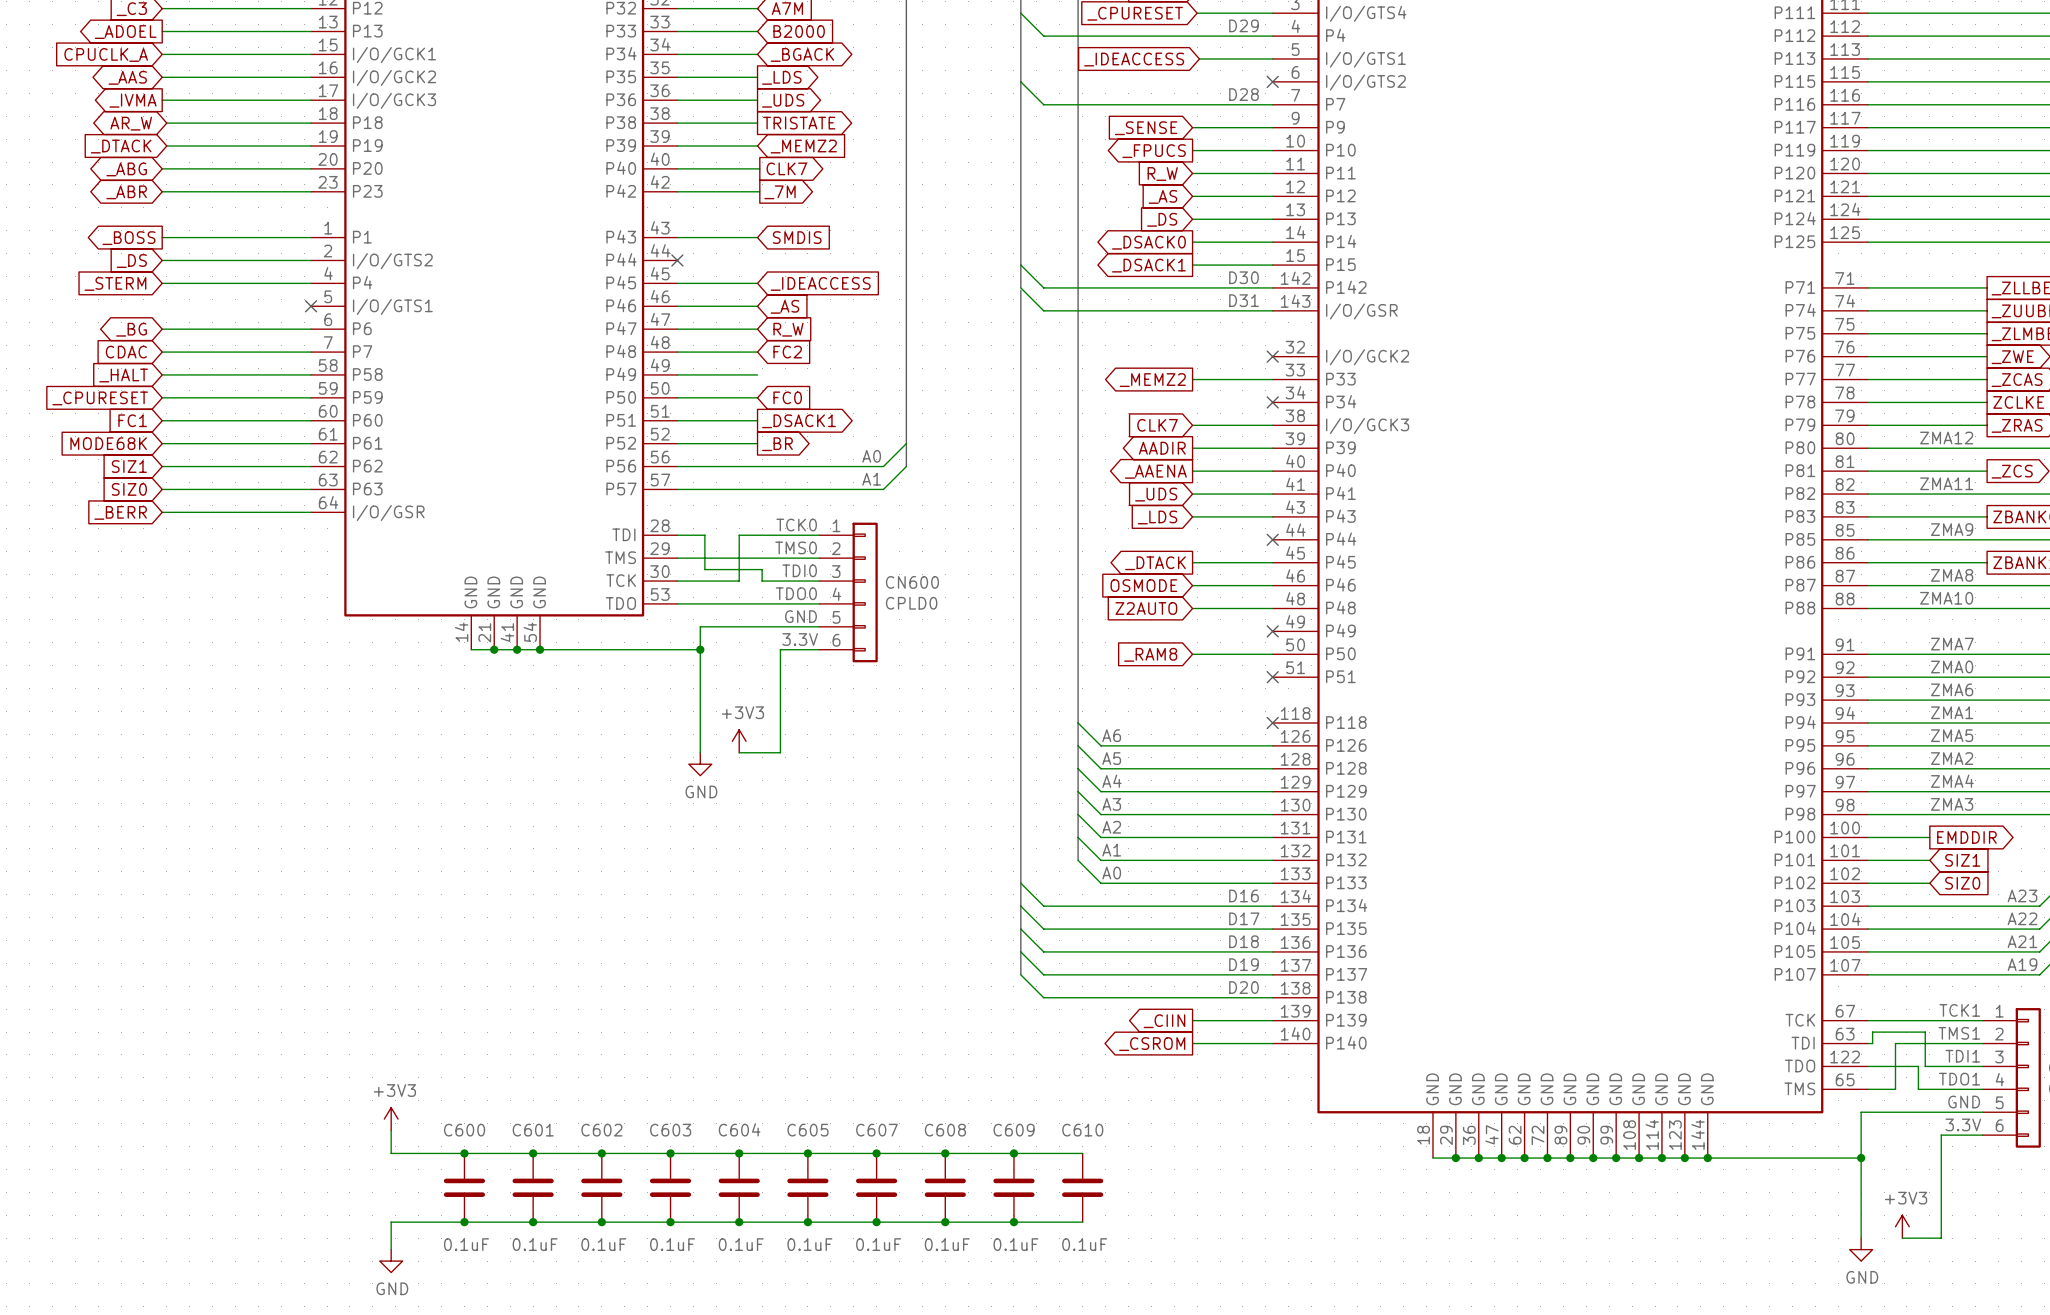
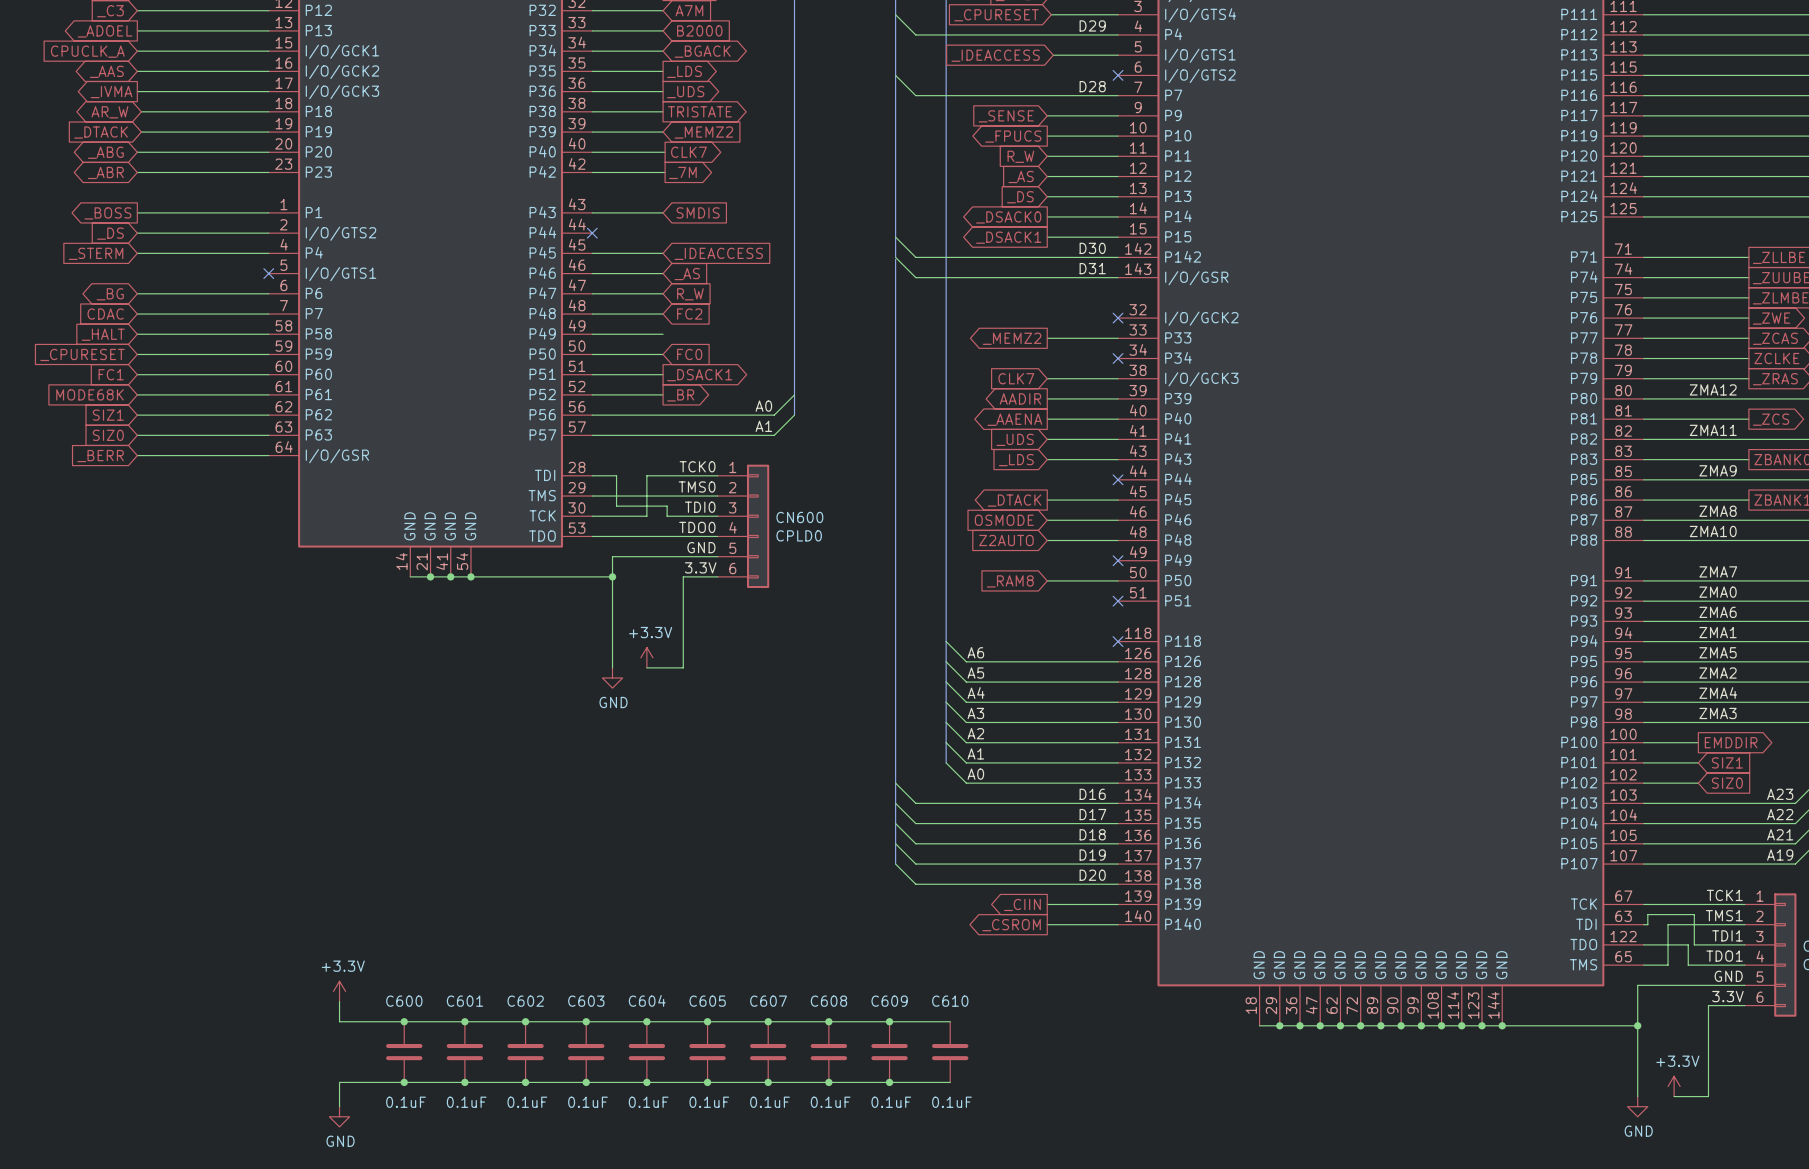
power symbol: +3V3 (739, 741) -> +3.3V (646, 657)
power symbol: +3V3 (391, 1119) -> +3.3V (339, 991)
power symbol: +3V3 (1902, 1226) -> +3.3V (1674, 1086)

